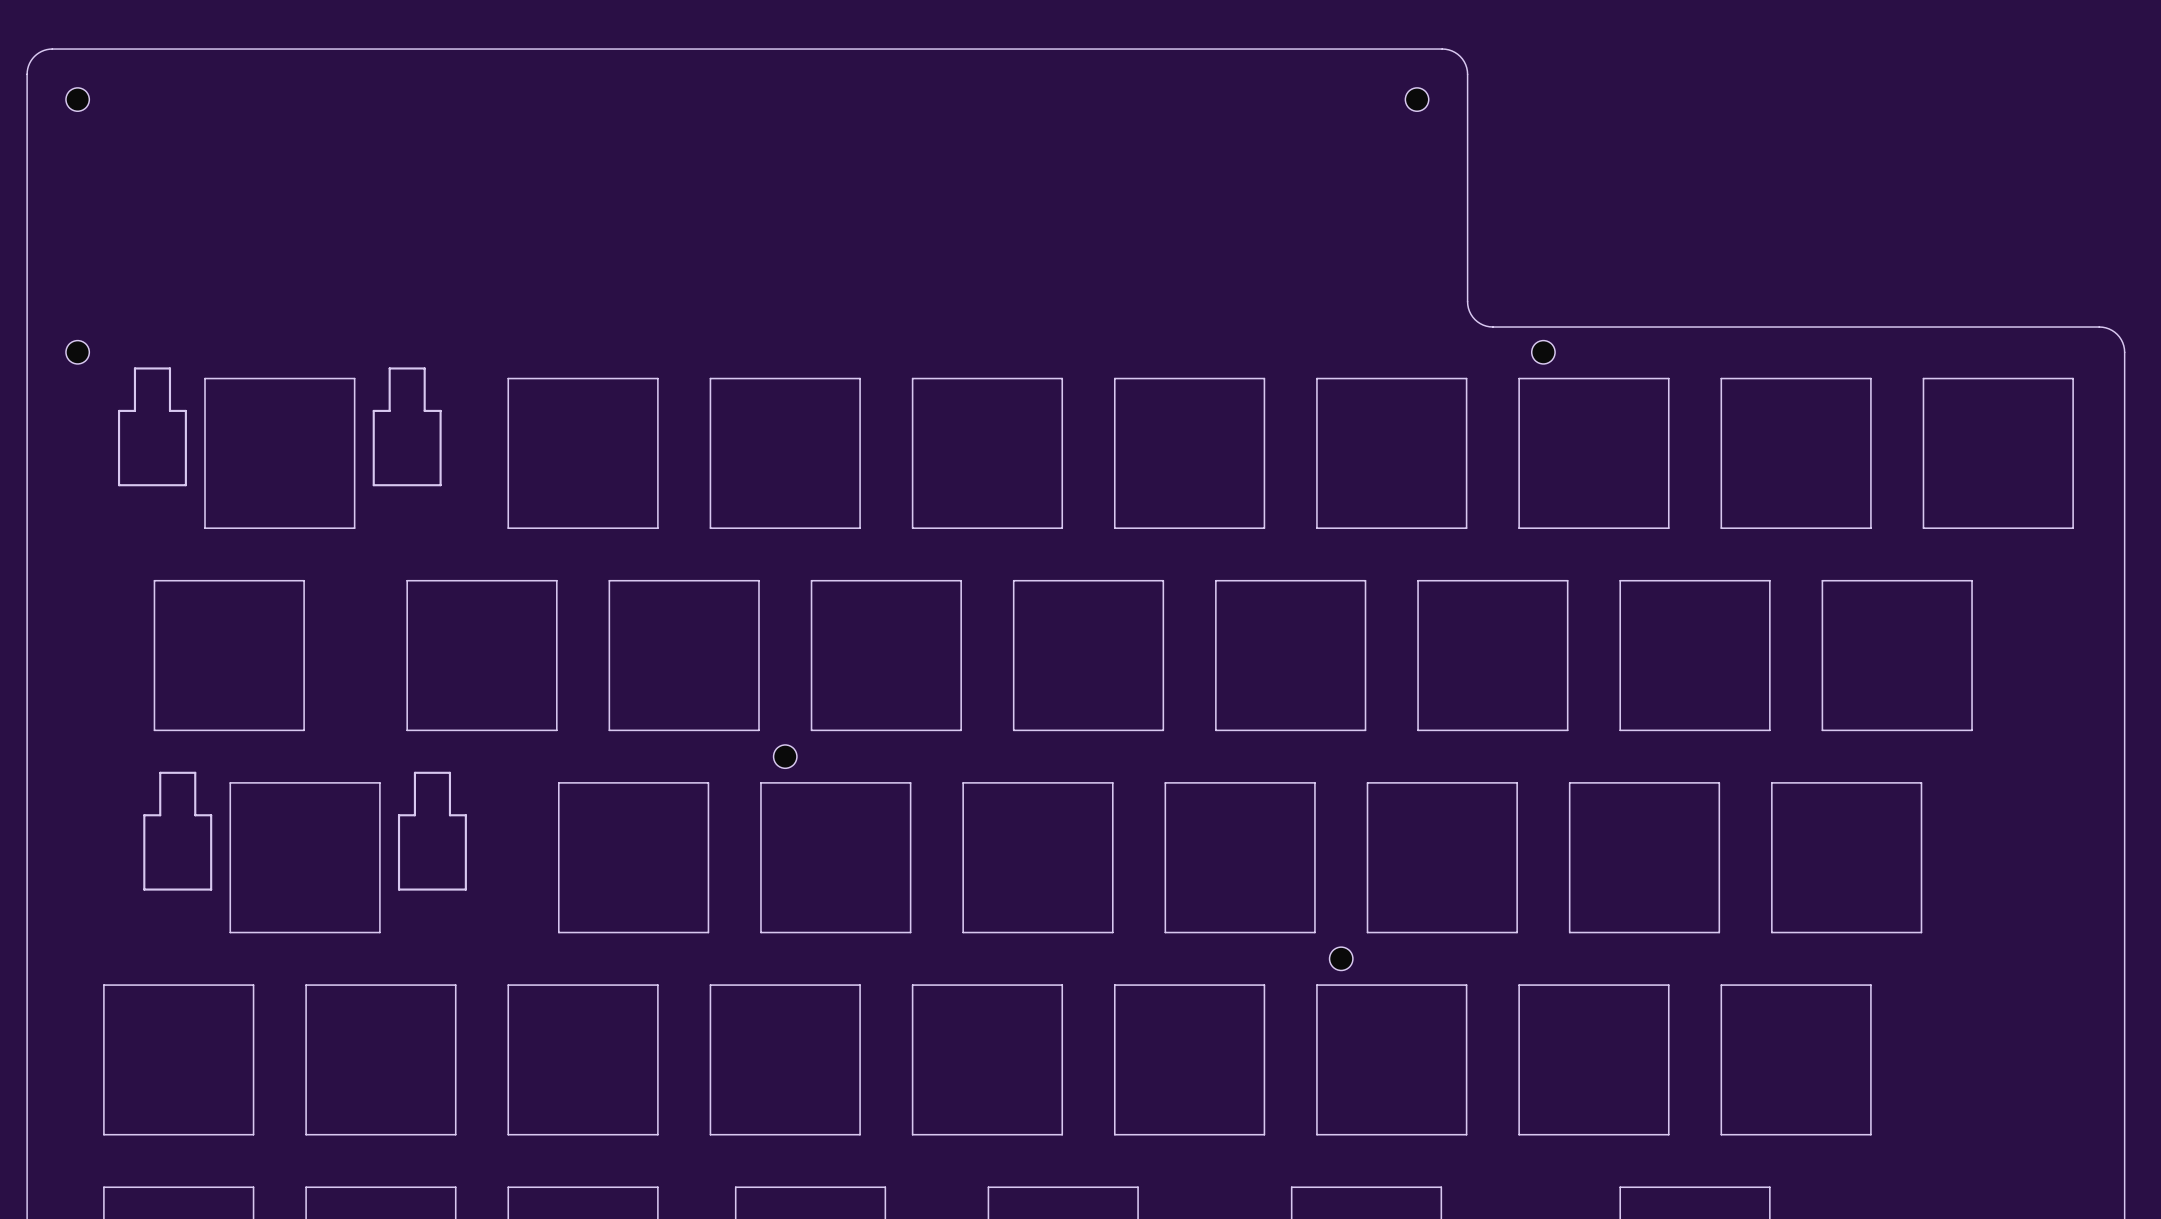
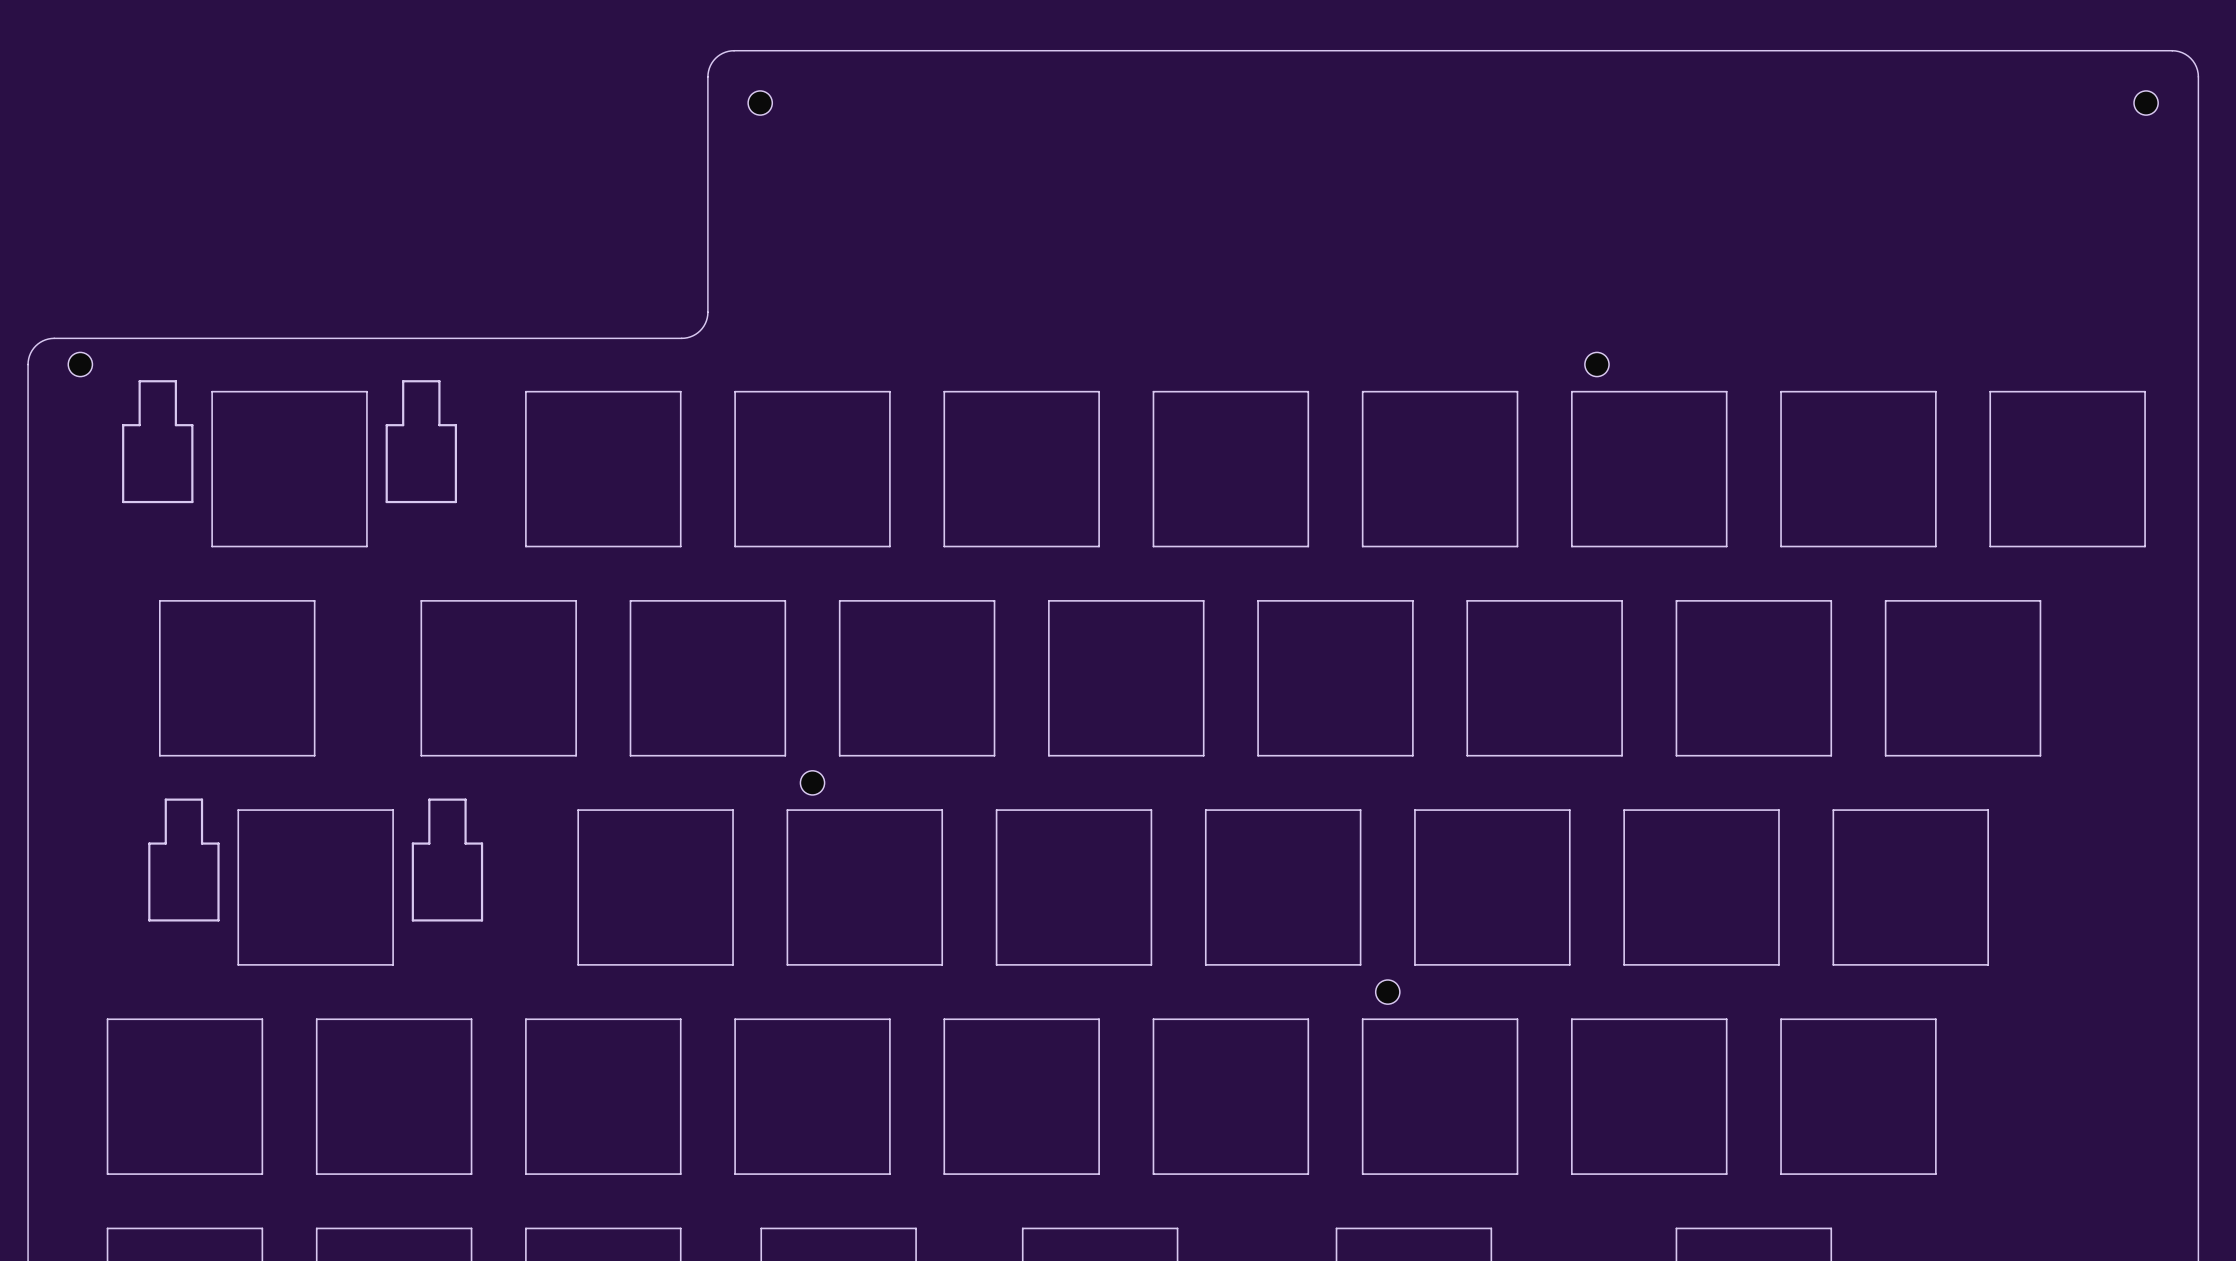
board edge: (709, 49) (52, 49) (41, 51) (30, 60) (27, 74) (27, 352) -> (734, 50) (722, 53) (715, 58) (708, 73) (707, 315) (703, 326) (693, 335) (681, 338) (54, 338) (45, 339) (35, 346) (30, 353) (28, 364)
board edge: (1442, 49) (1457, 54) (1464, 61) (1467, 70) (1467, 301) (1470, 314) (1483, 325) (1492, 327) (2099, 327) (2109, 328) (2117, 334) (2122, 342) (2124, 352) -> (1492, 50) (2172, 50) (2182, 52) (2192, 60) (2198, 76) (2198, 364)
part: (77, 99) -> none
part: none -> (760, 103)
part: (1417, 99) -> none
part: none -> (2146, 103)

